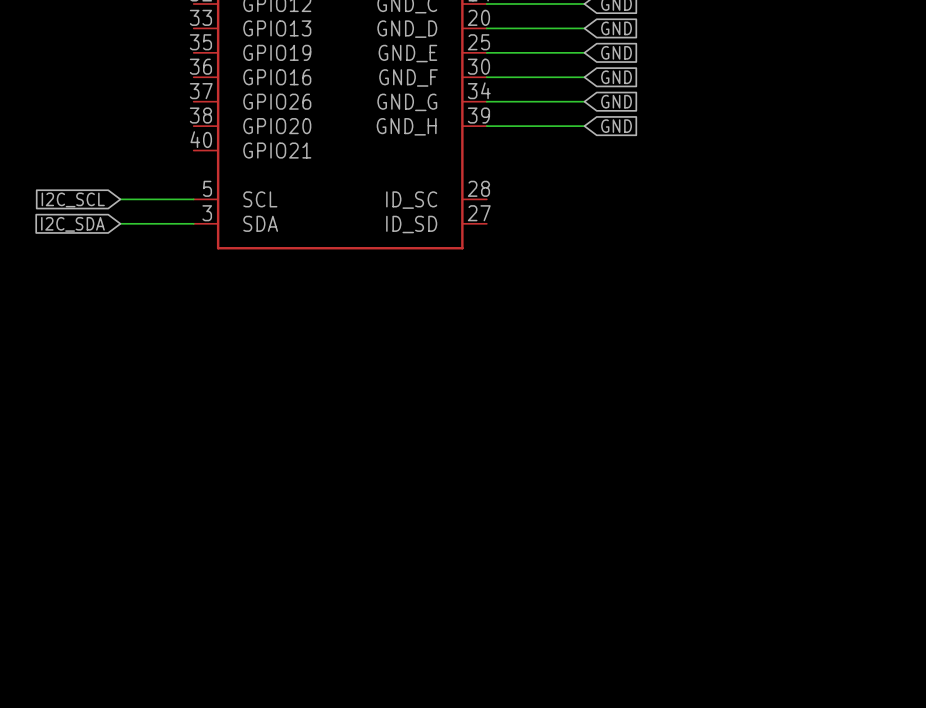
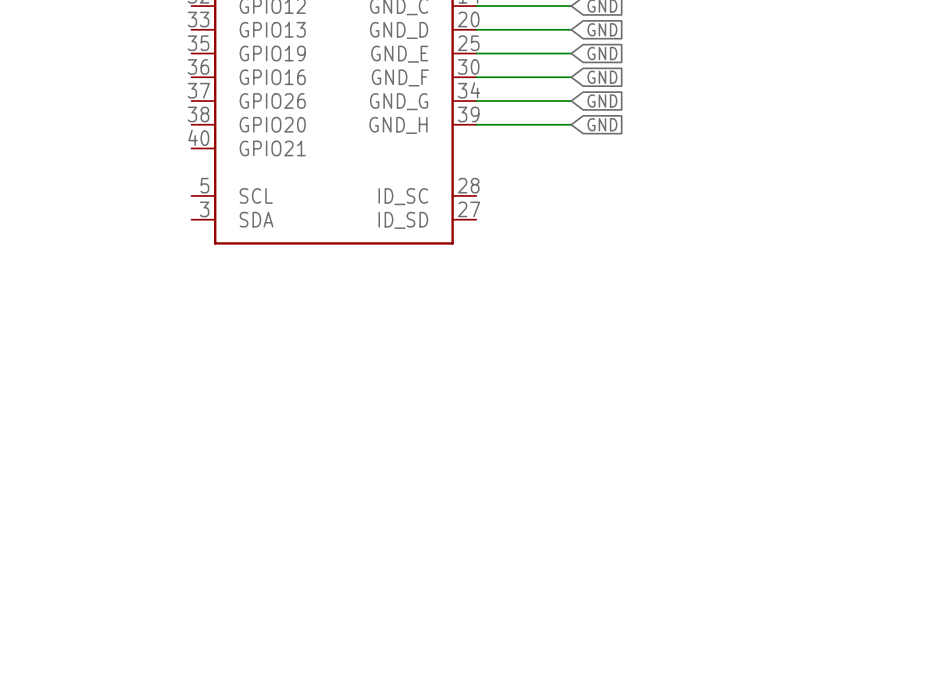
global label: I2C_SCL (73, 199) -> none
wire: (120, 199) (193, 199) -> none
wire: (120, 223) (193, 223) -> none
global label: I2C_SDA (72, 224) -> none

